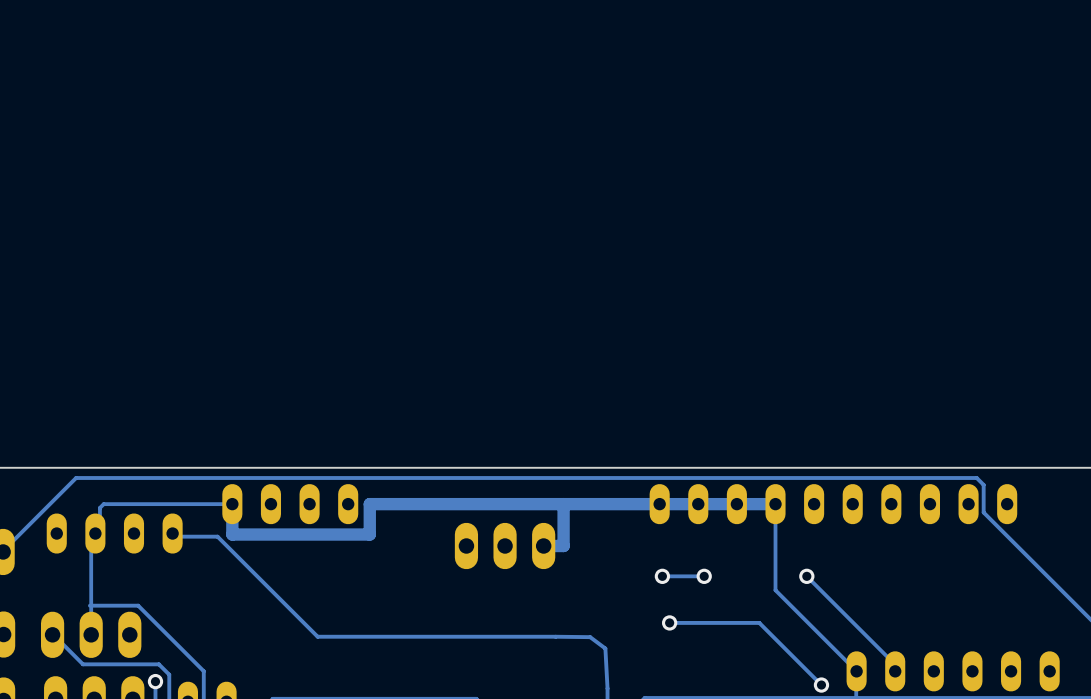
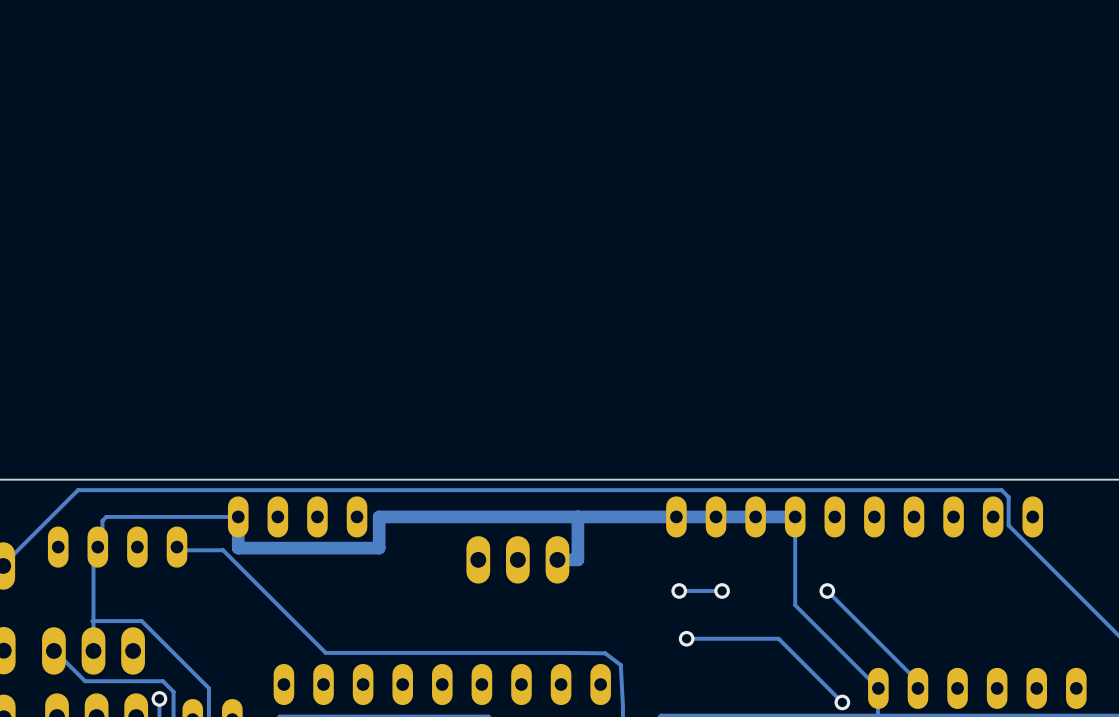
part: none -> (442, 684)

